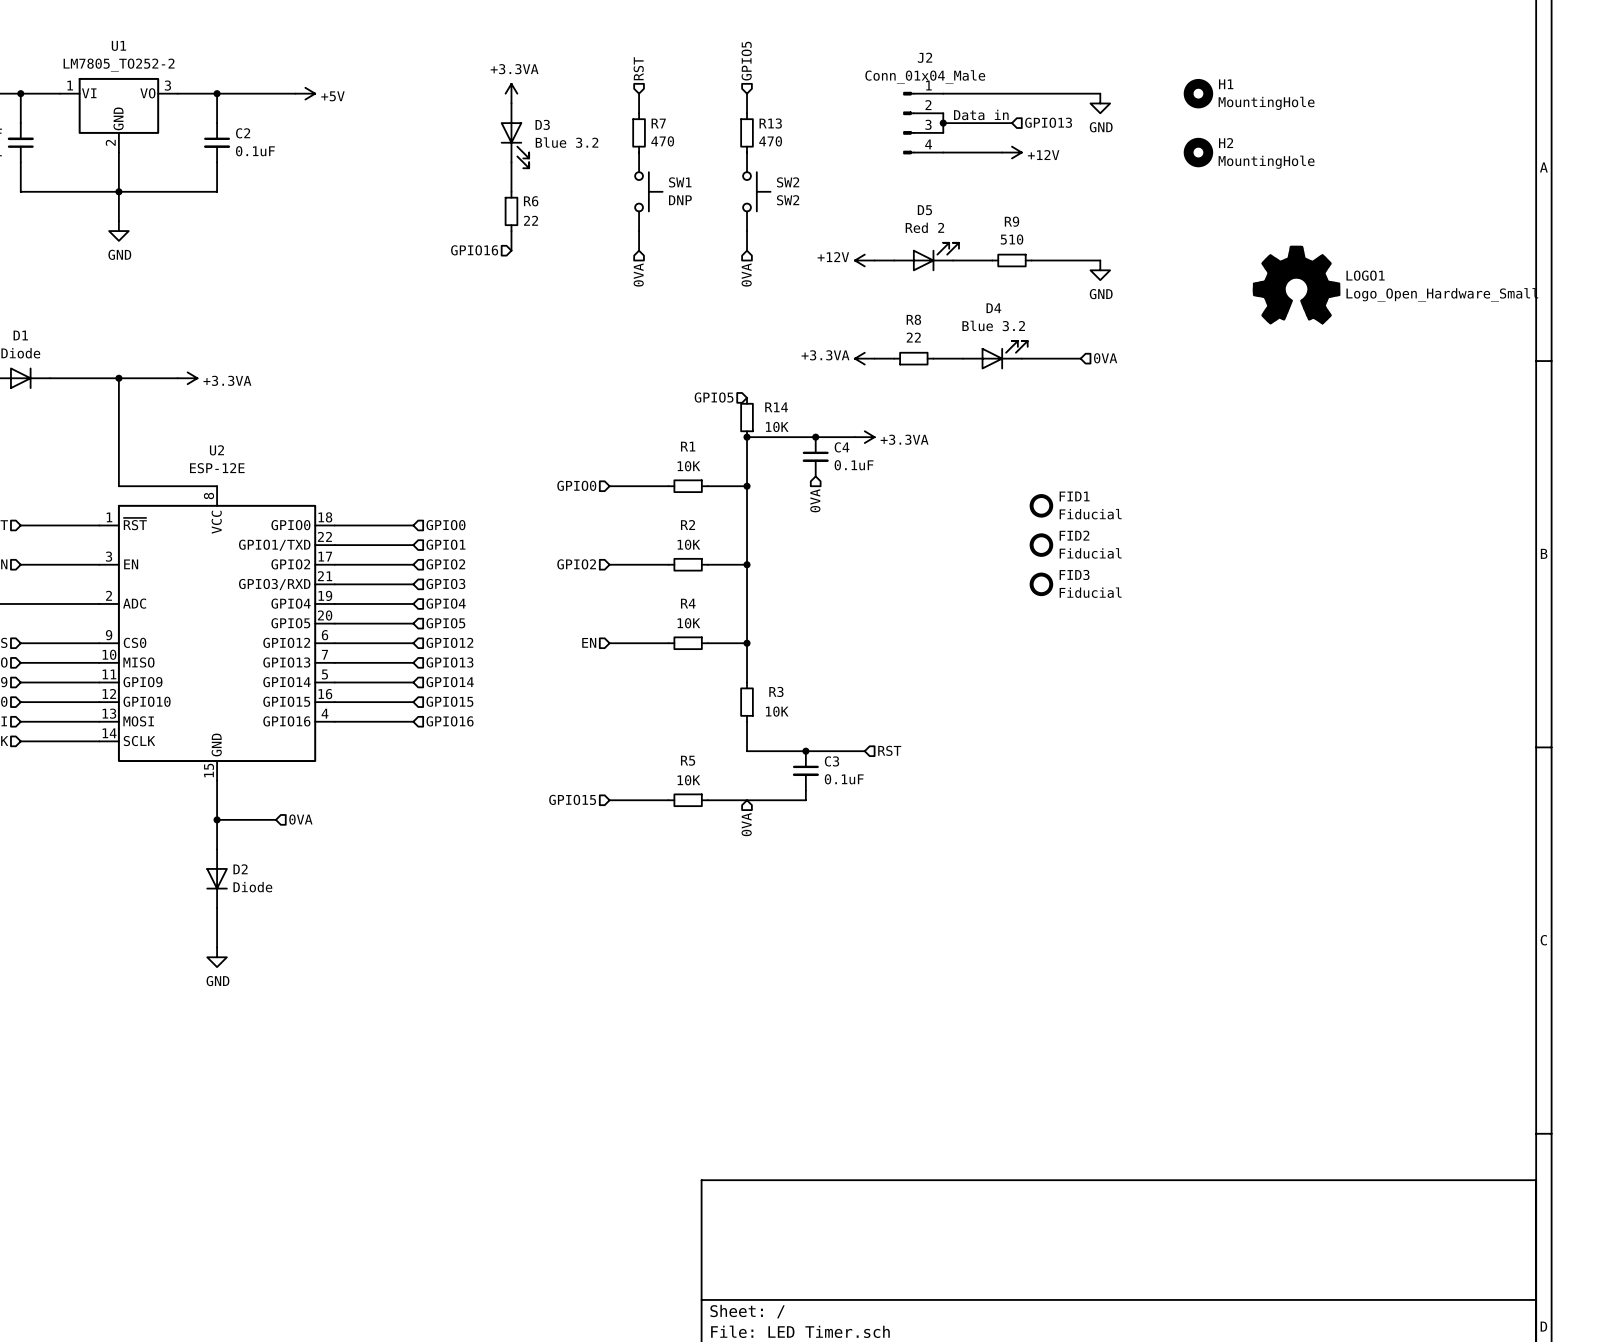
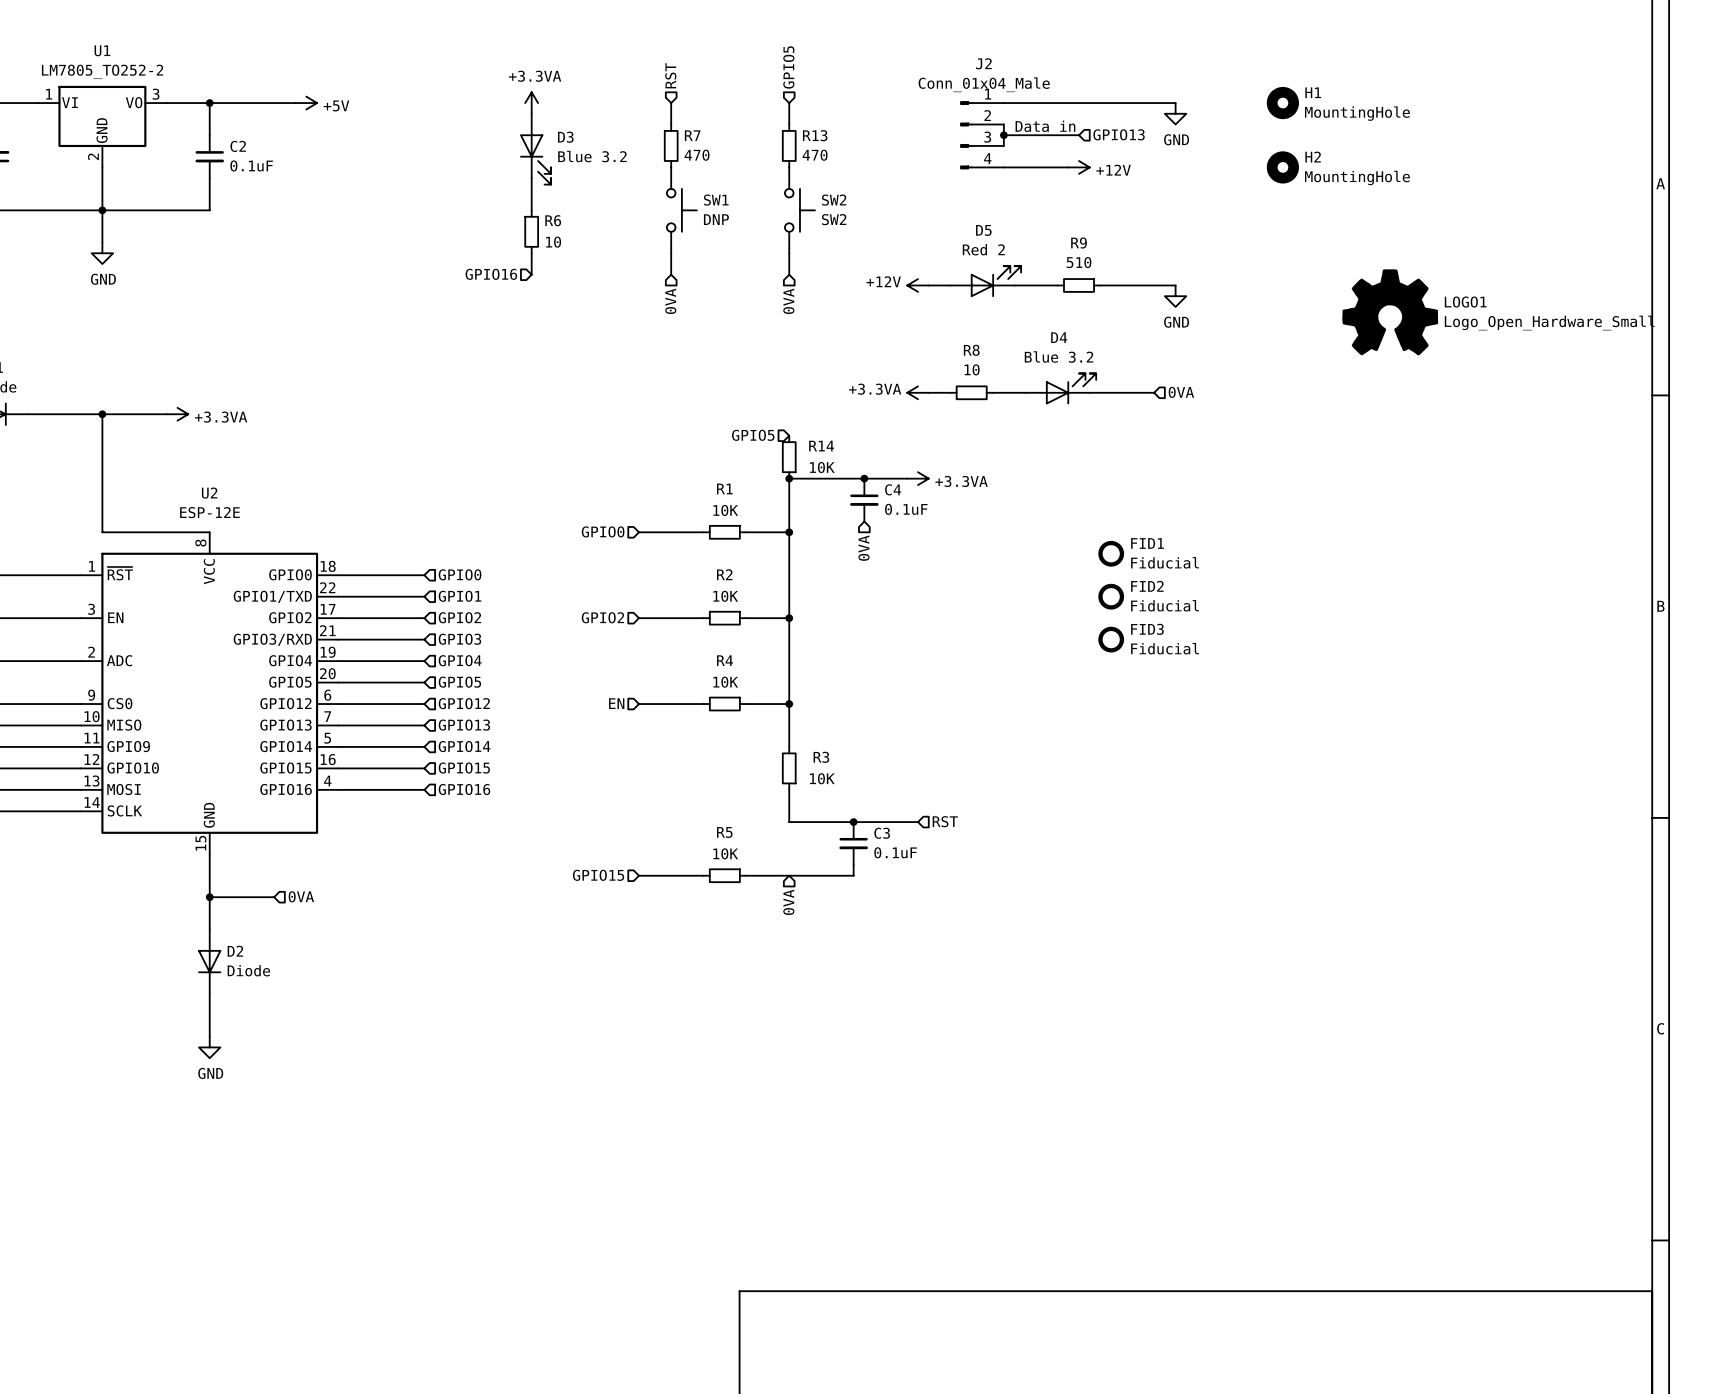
R6 value: 22 (531, 220) -> 10 (553, 242)
R8 value: 22 (913, 337) -> 10 (972, 369)

